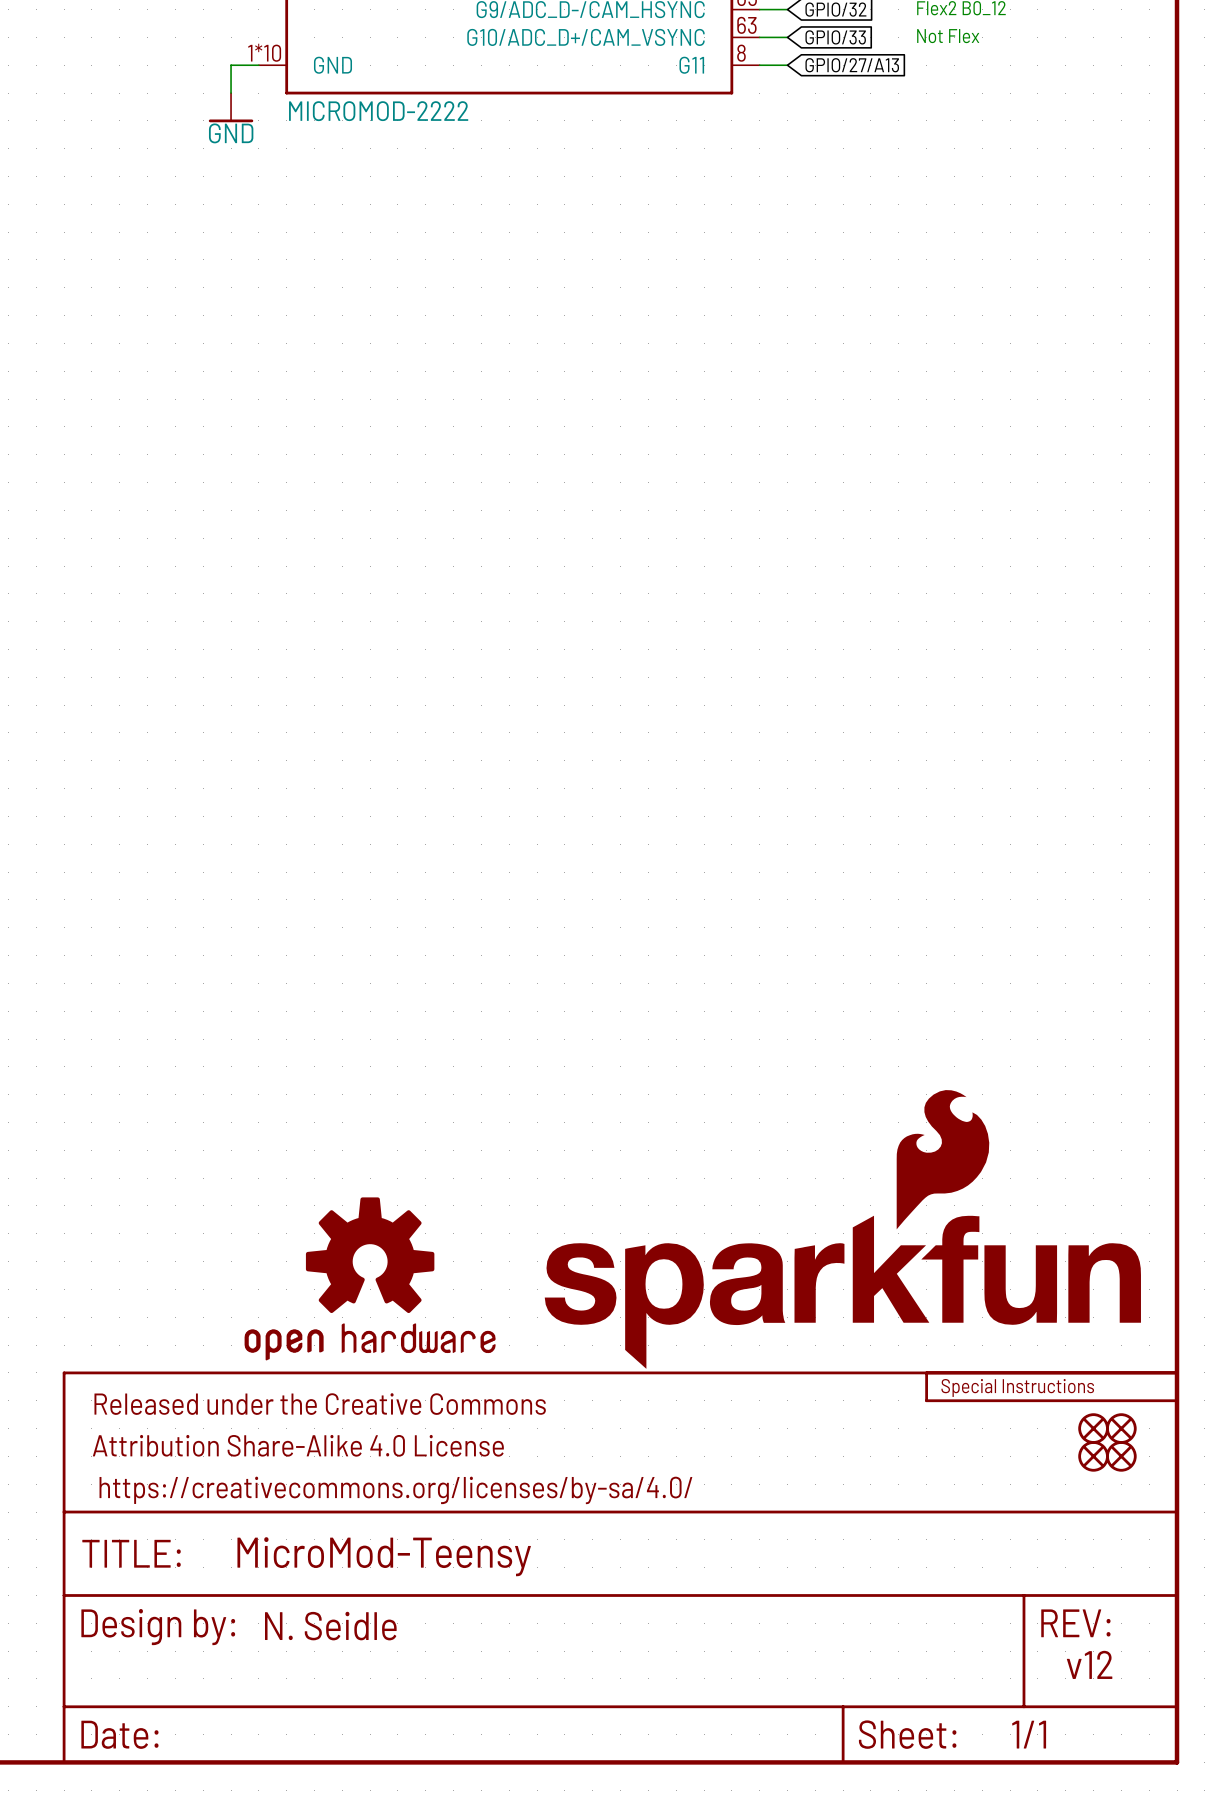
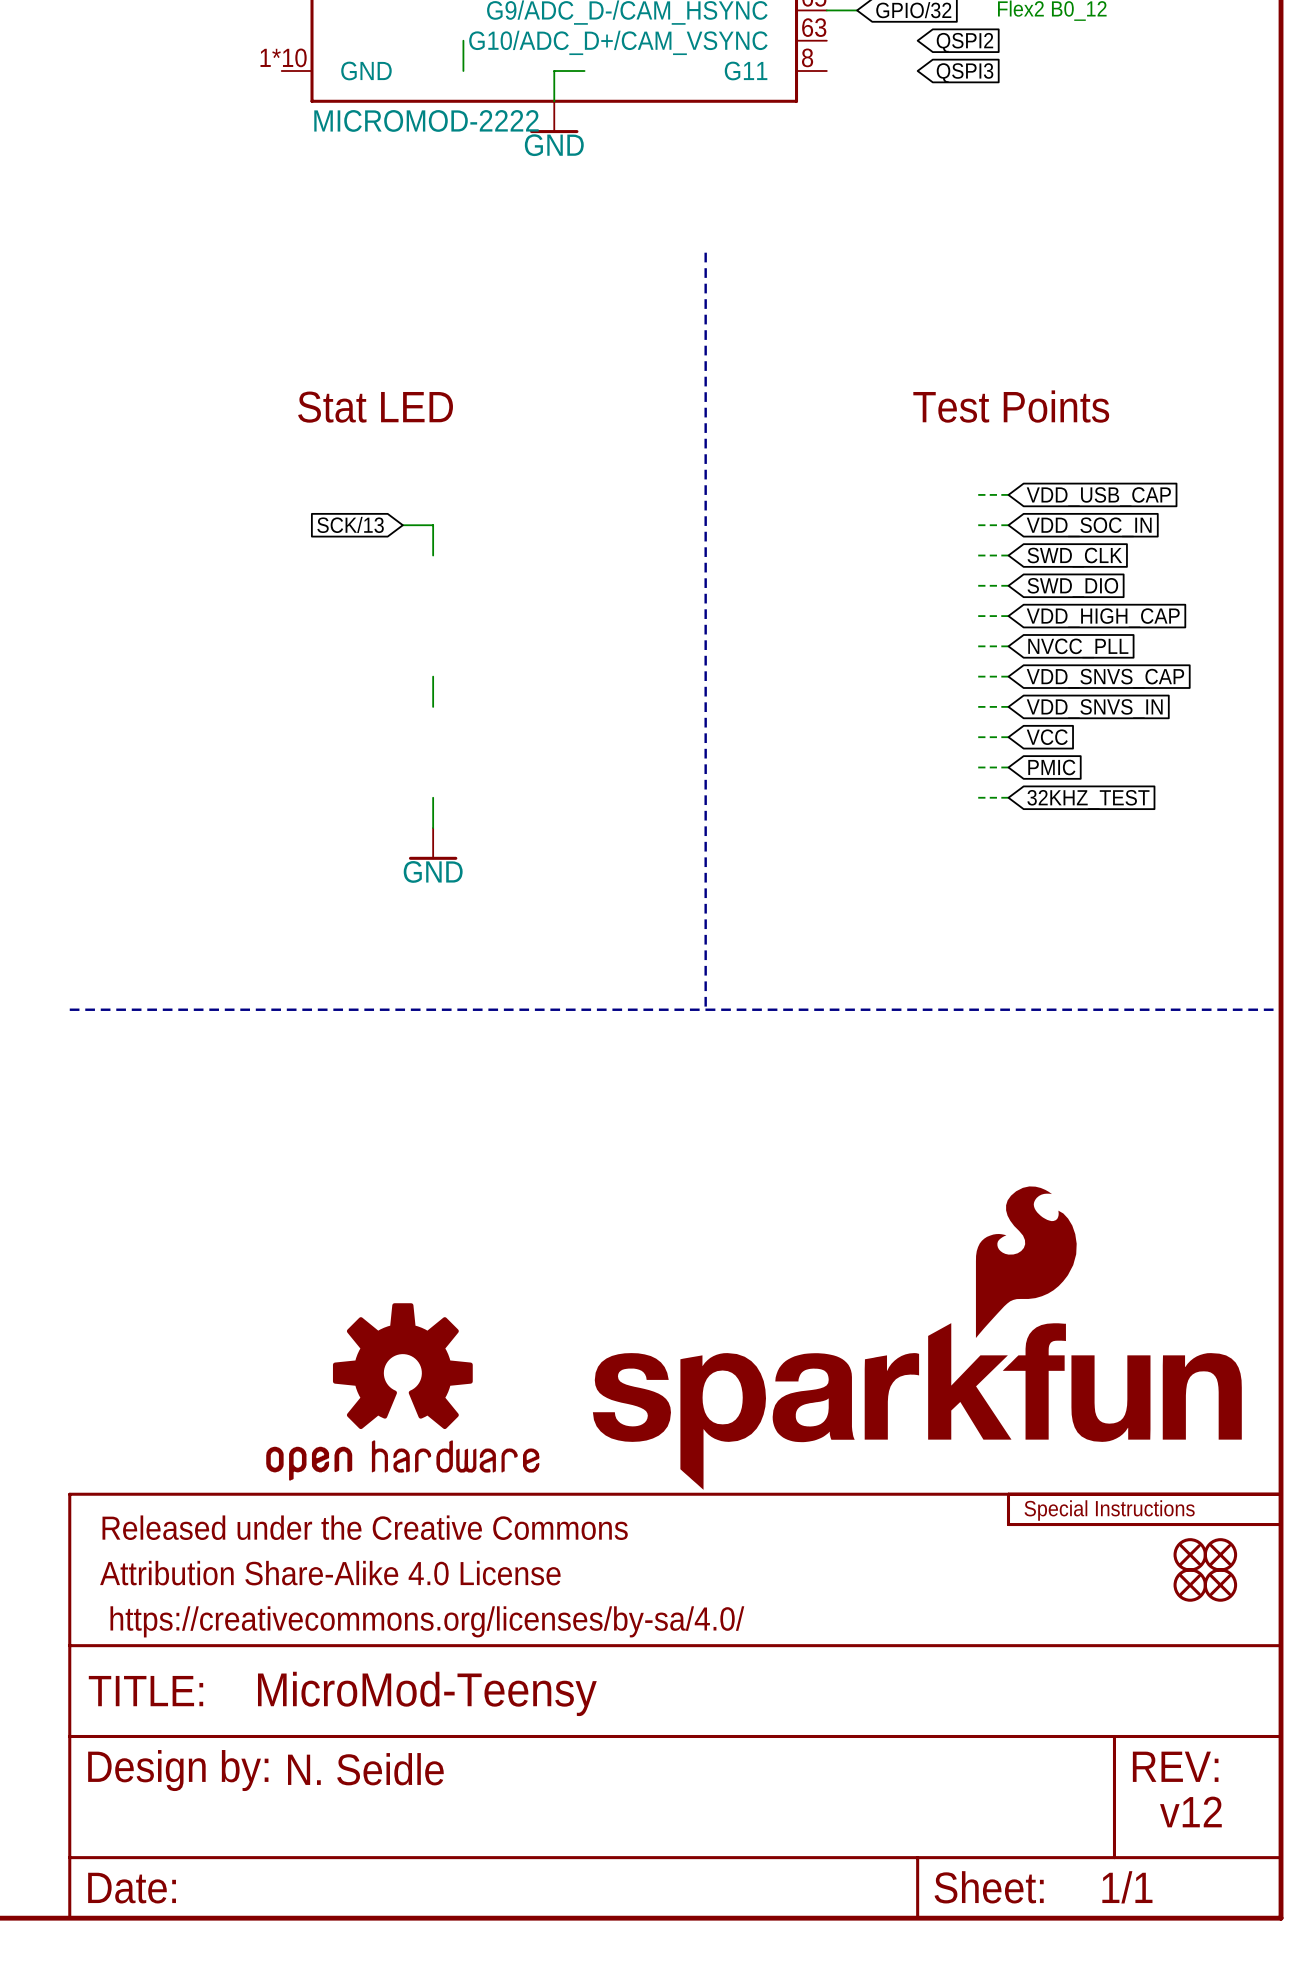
text: Not Flex (948, 36) -> none
wire: none -> (463, 40) (463, 71)
wire: (759, 37) (787, 37) -> none
global label: GPIO/33 (835, 37) -> none
global label: none -> QSPI2 (964, 42)
wire: (258, 65) (231, 65) (231, 93) -> none
wire: none -> (584, 71) (554, 71) (554, 101)
wire: (759, 65) (787, 65) -> none
global label: GPIO/27/A13 (852, 65) -> none
global label: none -> QSPI3 (965, 72)
power symbol: GND (231, 107) -> none
power symbol: none -> GND (554, 117)
line: none -> (705, 252) (705, 1009)
text: none -> Stat LED (375, 407)
text: none -> Test Points (1011, 406)
wire: none -> (978, 494) (1008, 494)
global label: none -> VDD_USB_CAP (1098, 497)
global label: none -> SCK/13 (350, 524)
wire: none -> (402, 525) (433, 525) (433, 555)
wire: none -> (978, 525) (1008, 525)
global label: none -> VDD_SOC_IN (1089, 527)
wire: none -> (978, 555) (1008, 555)
global label: none -> SWD_CLK (1074, 557)
wire: none -> (978, 585) (1008, 585)
global label: none -> SWD_DIO (1072, 587)
wire: none -> (978, 616) (1008, 616)
global label: none -> VDD_HIGH_CAP (1103, 618)
wire: none -> (978, 646) (1008, 646)
global label: none -> NVCC_PLL (1078, 648)
wire: none -> (433, 676) (433, 706)
wire: none -> (978, 676) (1008, 676)
global label: none -> VDD_SNVS_CAP (1105, 678)
wire: none -> (978, 706) (1008, 706)
global label: none -> VDD_SNVS_IN (1094, 708)
wire: none -> (978, 737) (1008, 737)
global label: none -> VCC (1047, 737)
wire: none -> (978, 767) (1008, 767)
global label: none -> PMIC (1051, 767)
wire: none -> (433, 797) (433, 828)
wire: none -> (978, 797) (1008, 797)
global label: none -> 32KHZ_TEST (1088, 799)
power symbol: none -> GND (433, 843)
line: none -> (69, 1009) (1281, 1009) (1281, 1040)

